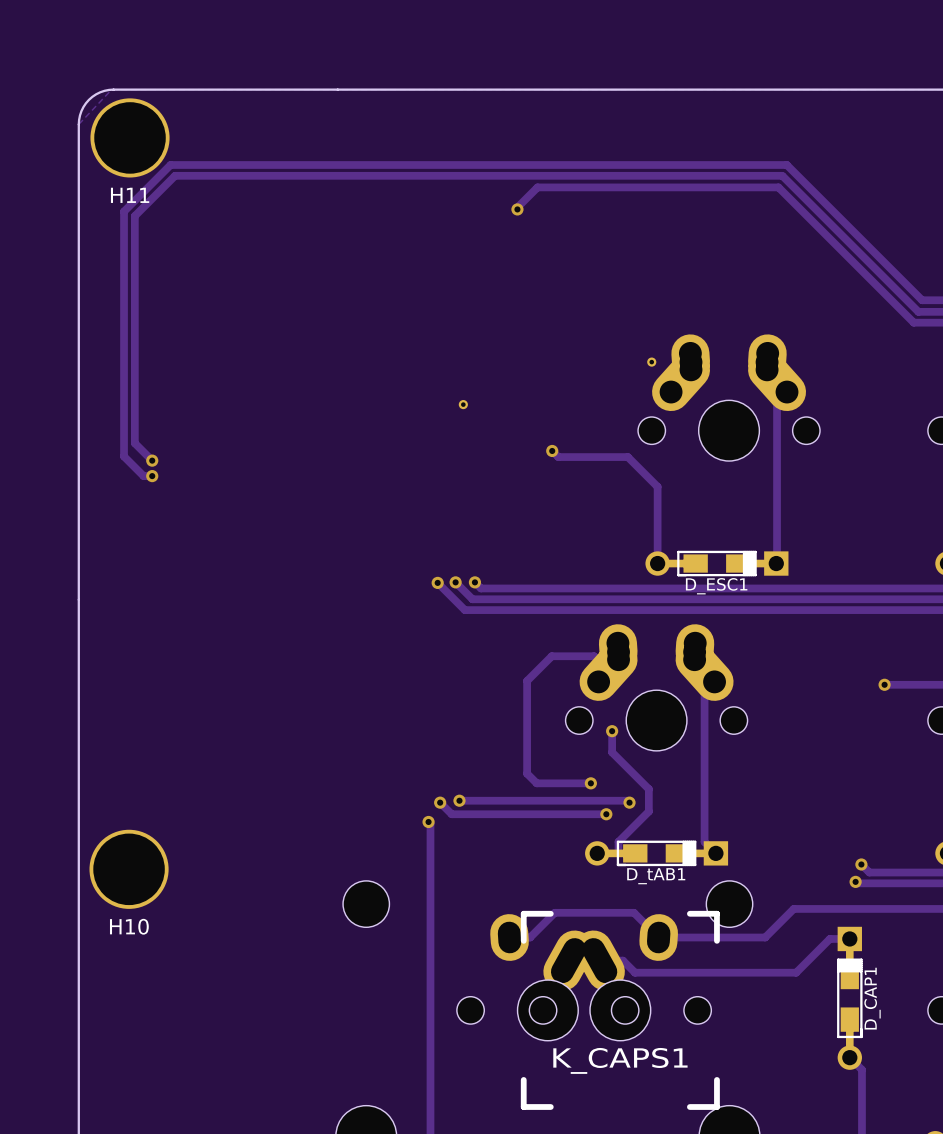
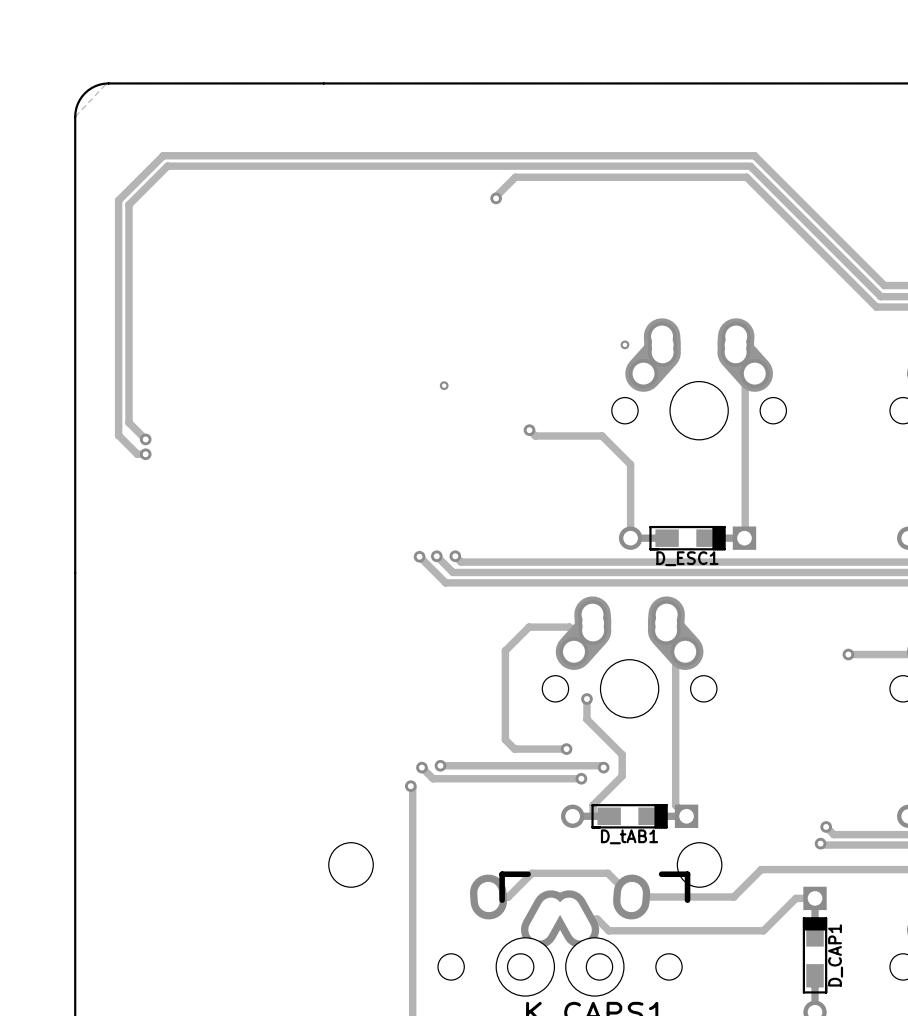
H11: (130, 137) -> none
H10: (129, 869) -> none

